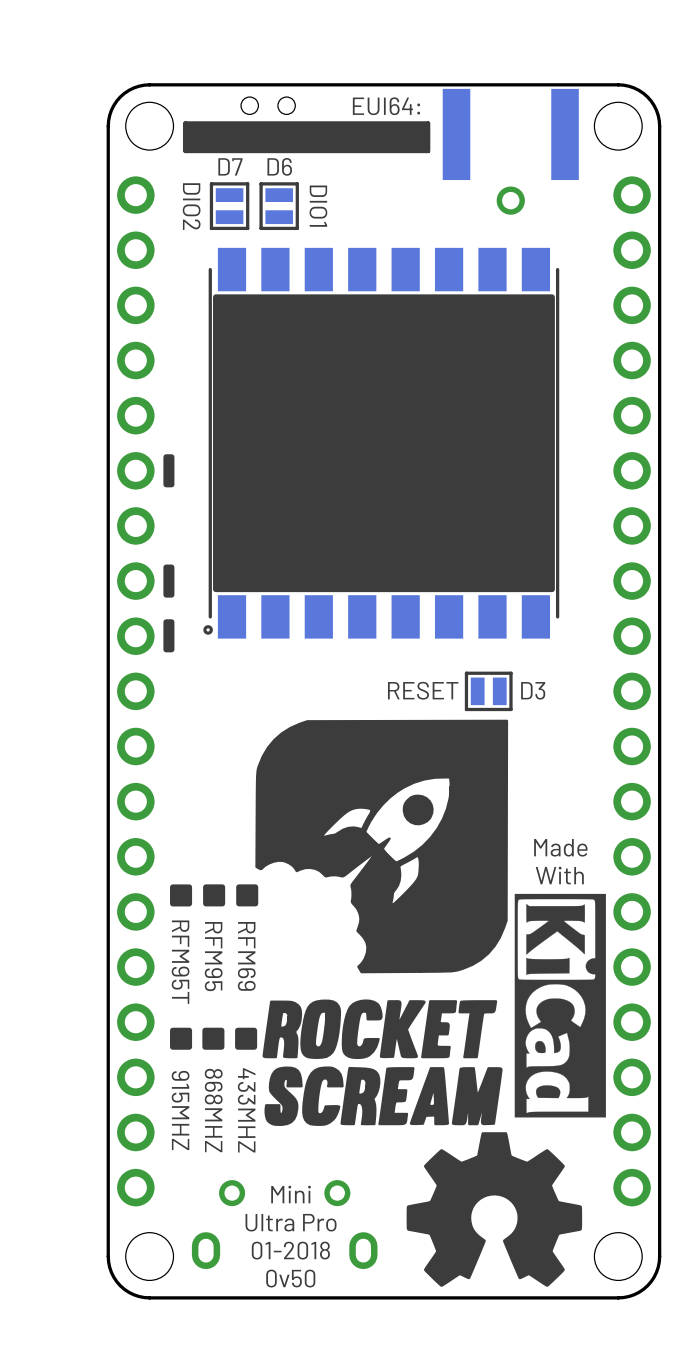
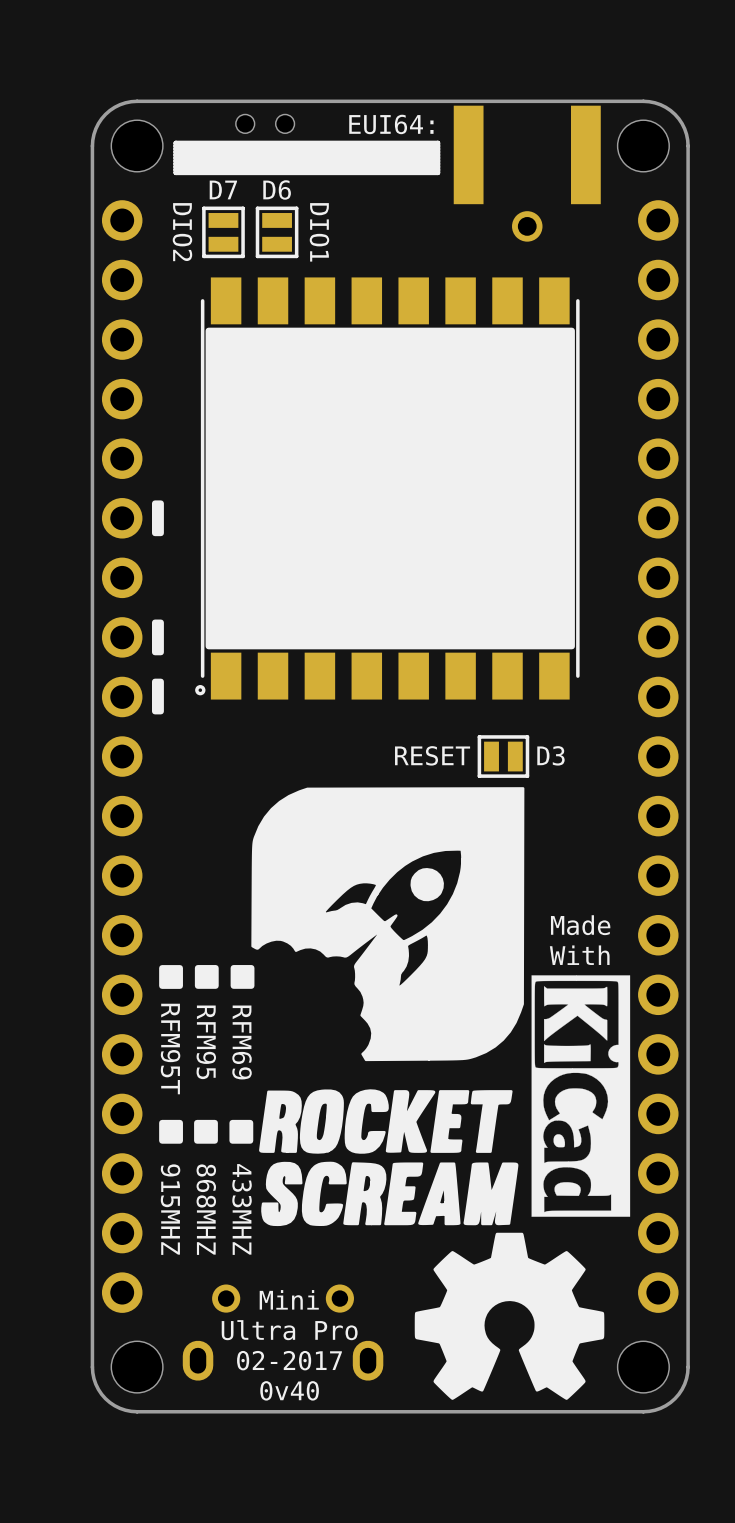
text: 01-2018 (290, 1250) -> 02-2017 (289, 1360)
text: 0v50 (290, 1278) -> 0v40 (289, 1390)

